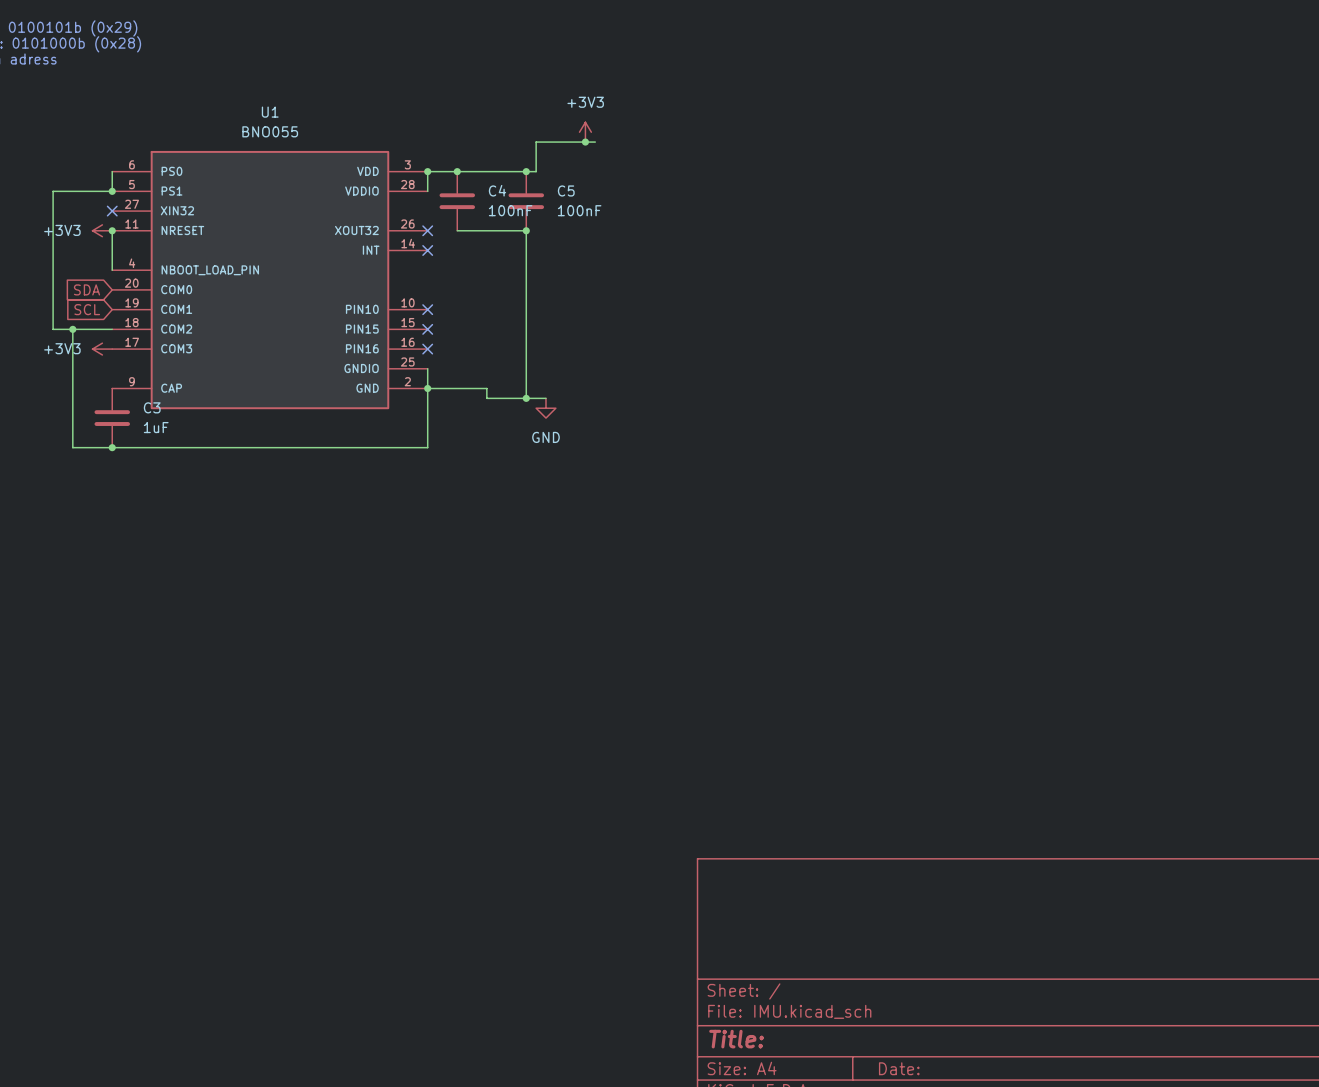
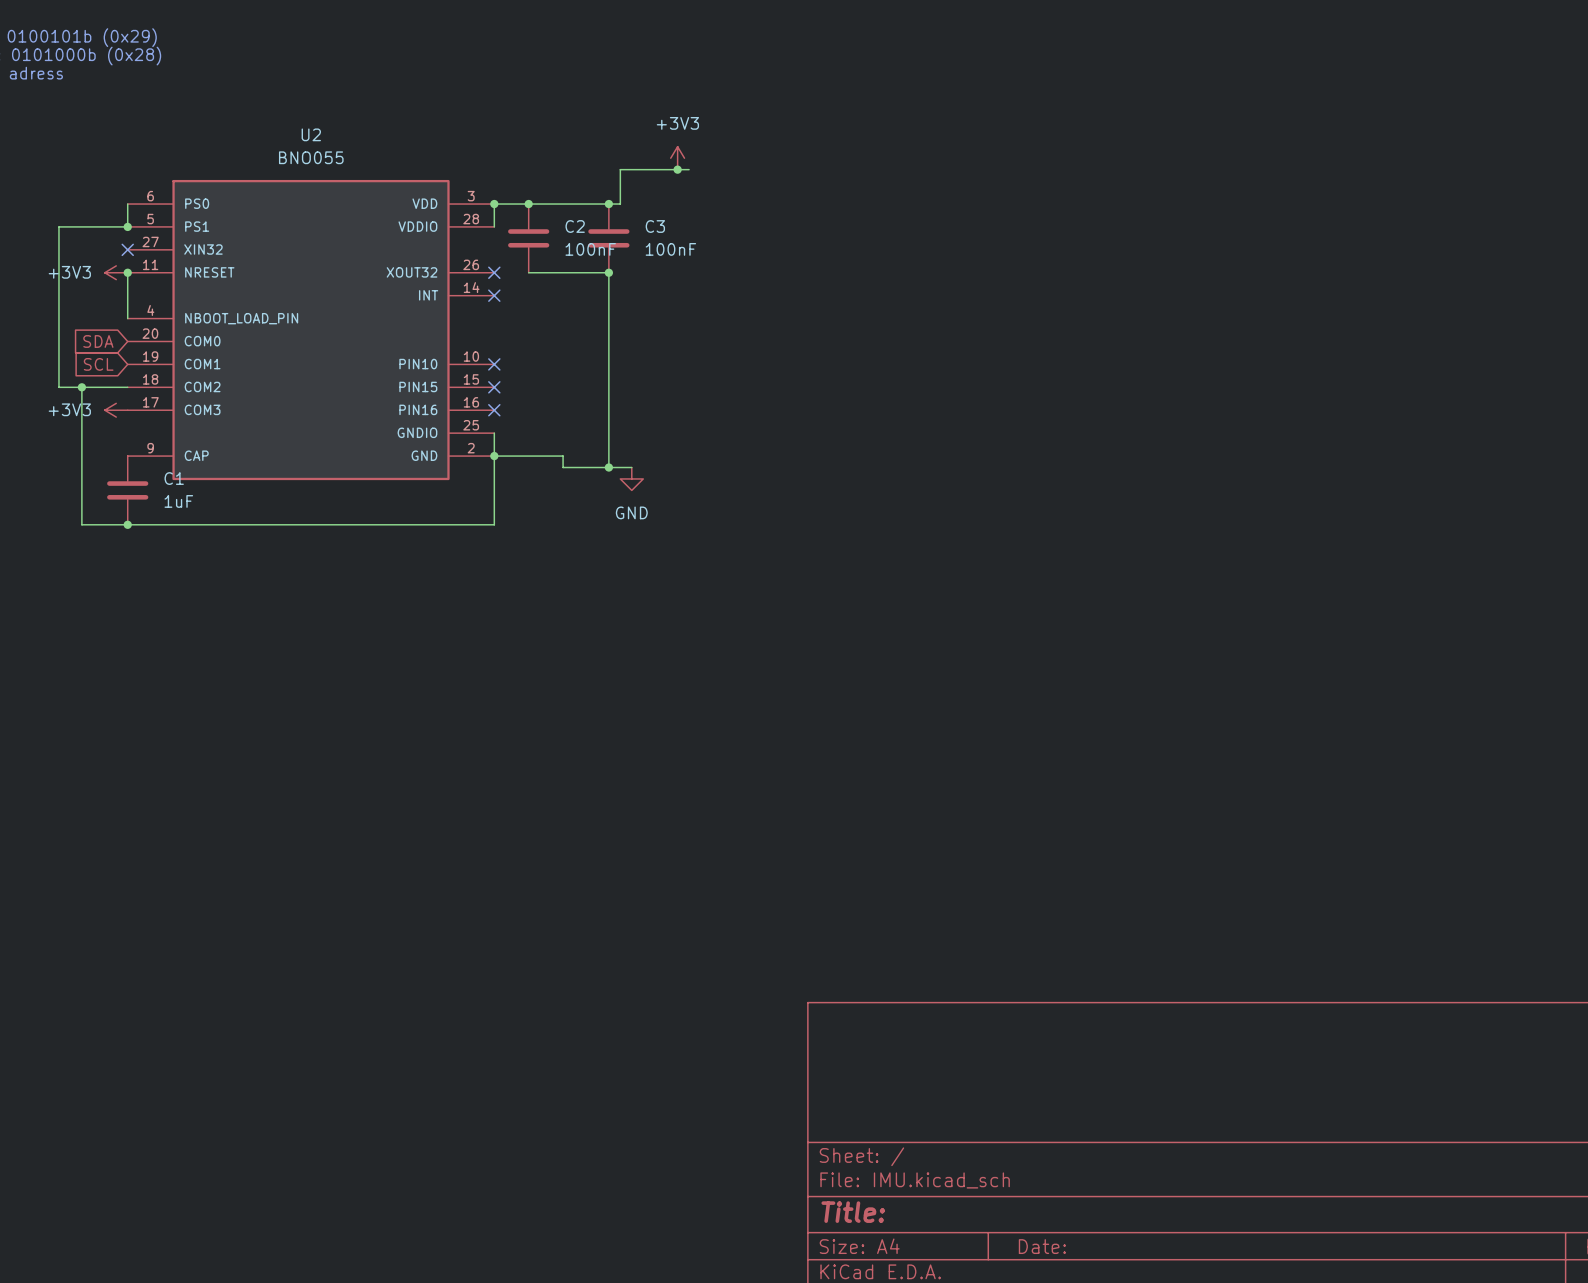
U1 name: U1 (270, 112) -> U2 (311, 134)
C4 name: C4 (497, 190) -> C2 (575, 226)
C5 name: C5 (566, 190) -> C3 (655, 226)
C3 name: C3 (152, 407) -> C1 (174, 478)

